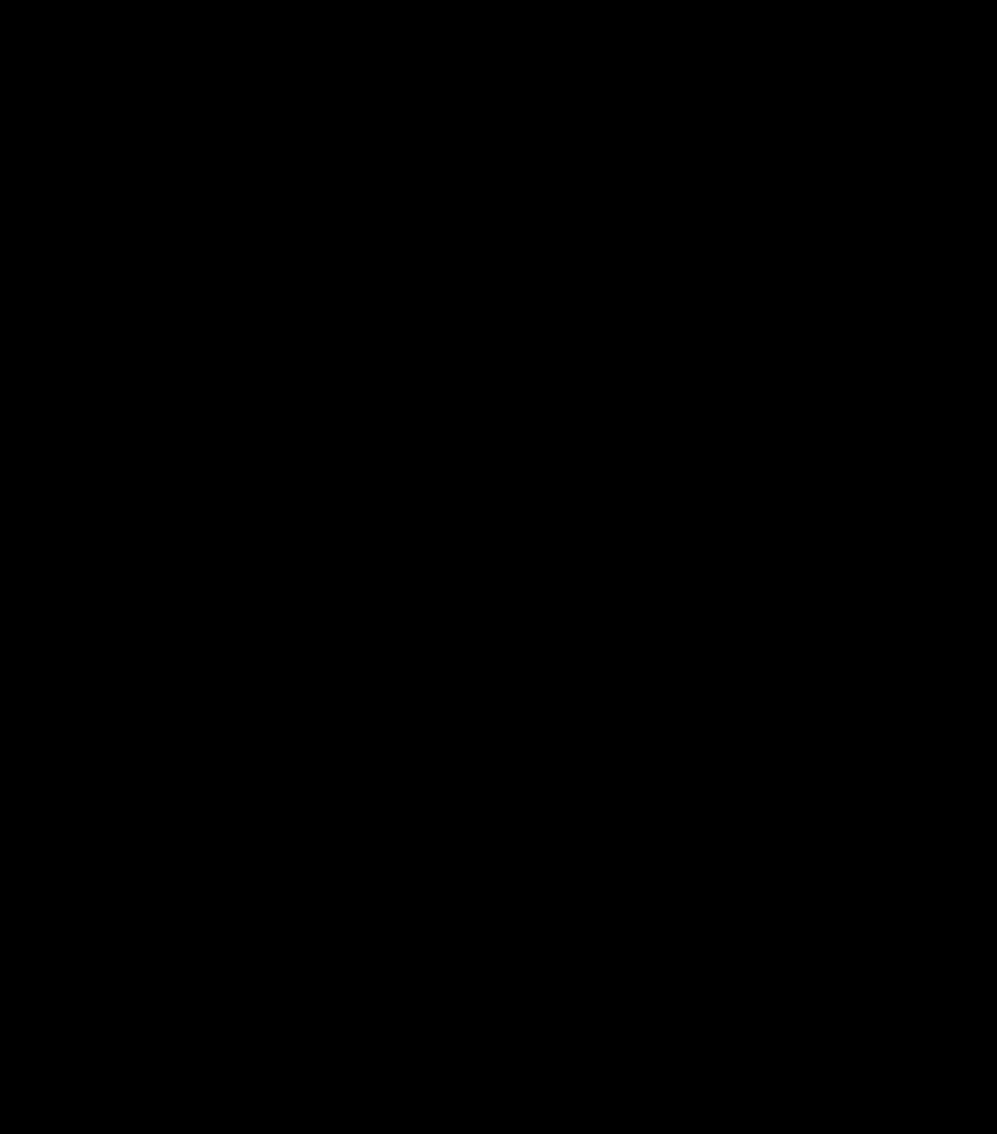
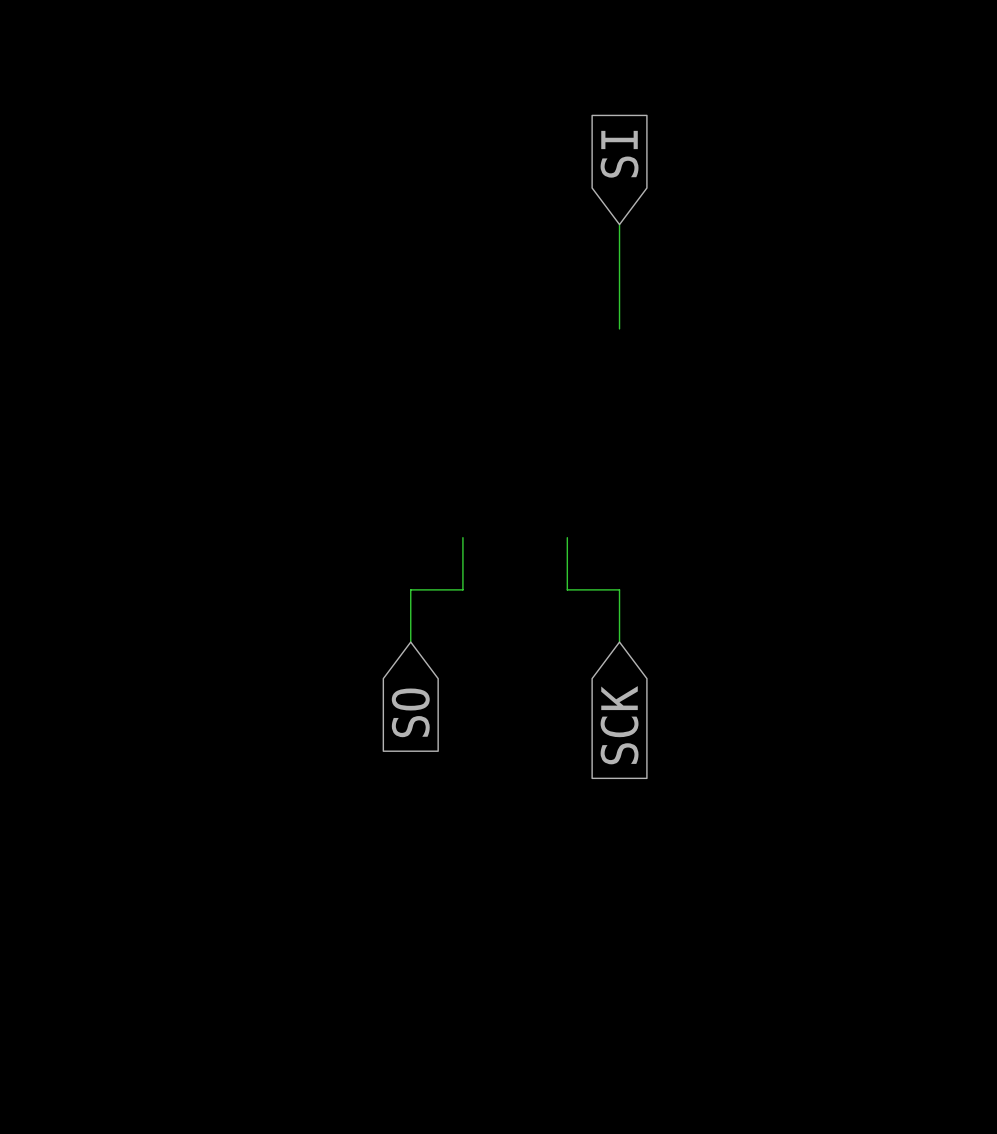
global label: none -> SI (619, 154)
wire: none -> (619, 224) (619, 328)
wire: none -> (462, 537) (462, 589) (410, 589) (410, 642)
wire: none -> (567, 537) (567, 589) (619, 589) (619, 642)
global label: none -> SO (410, 712)
global label: none -> SCK (619, 725)

